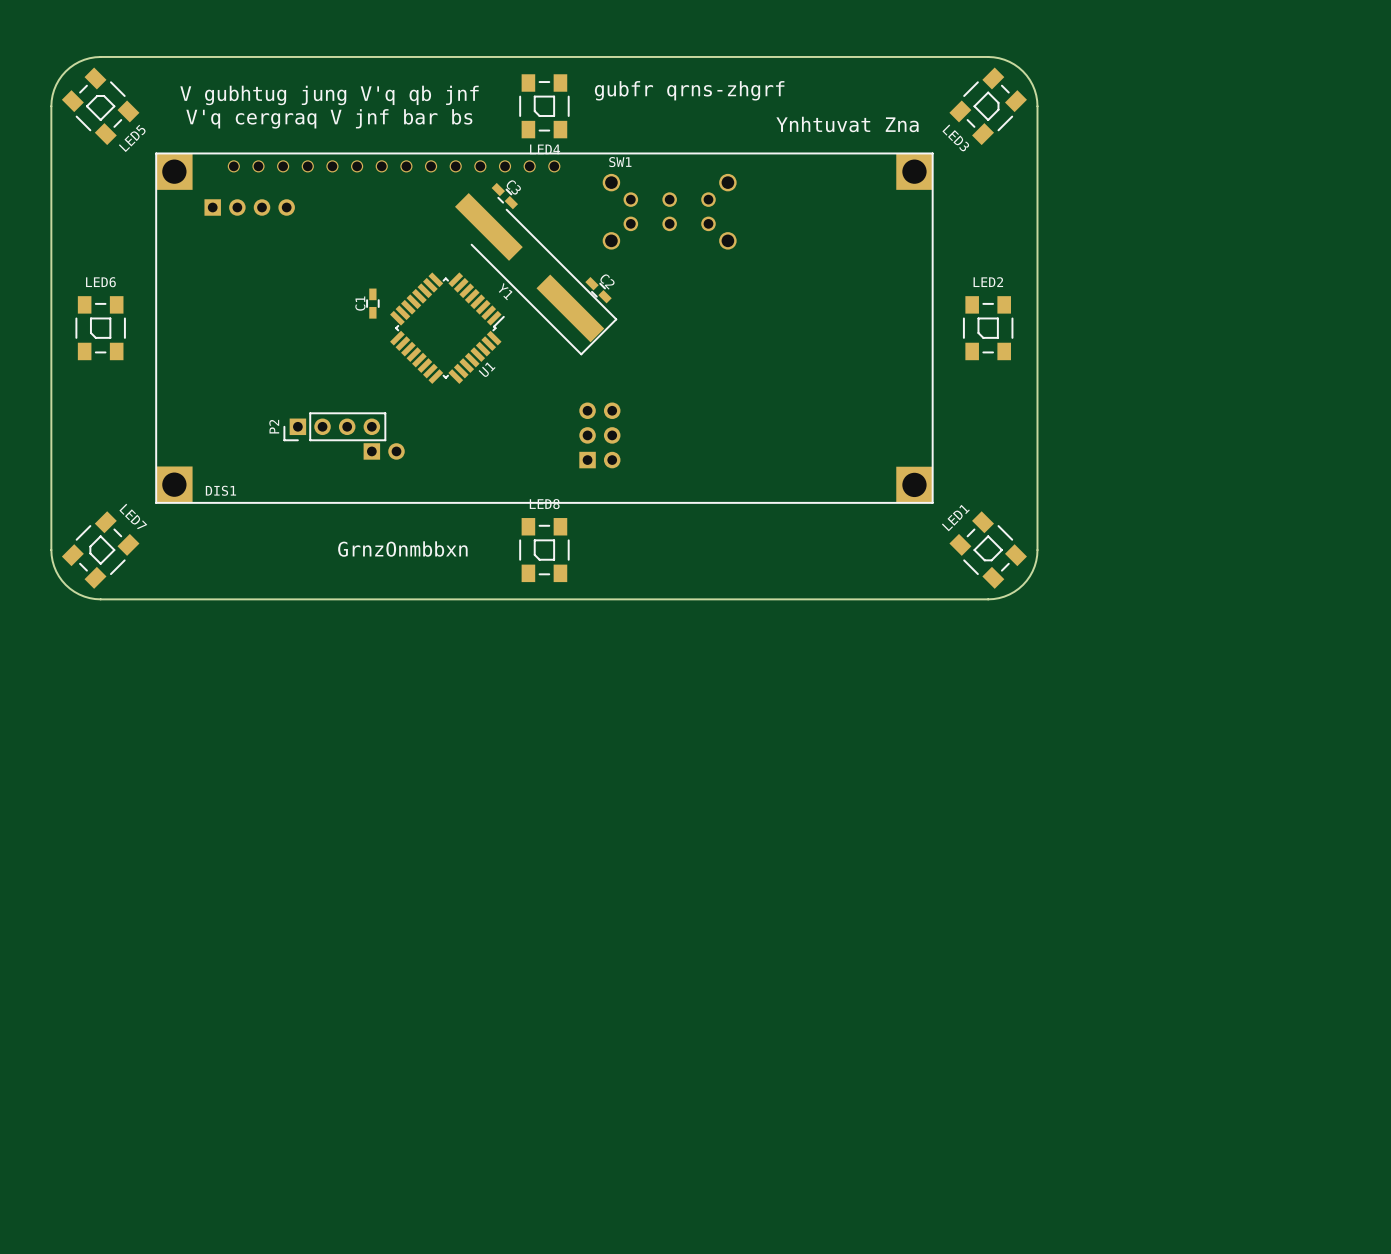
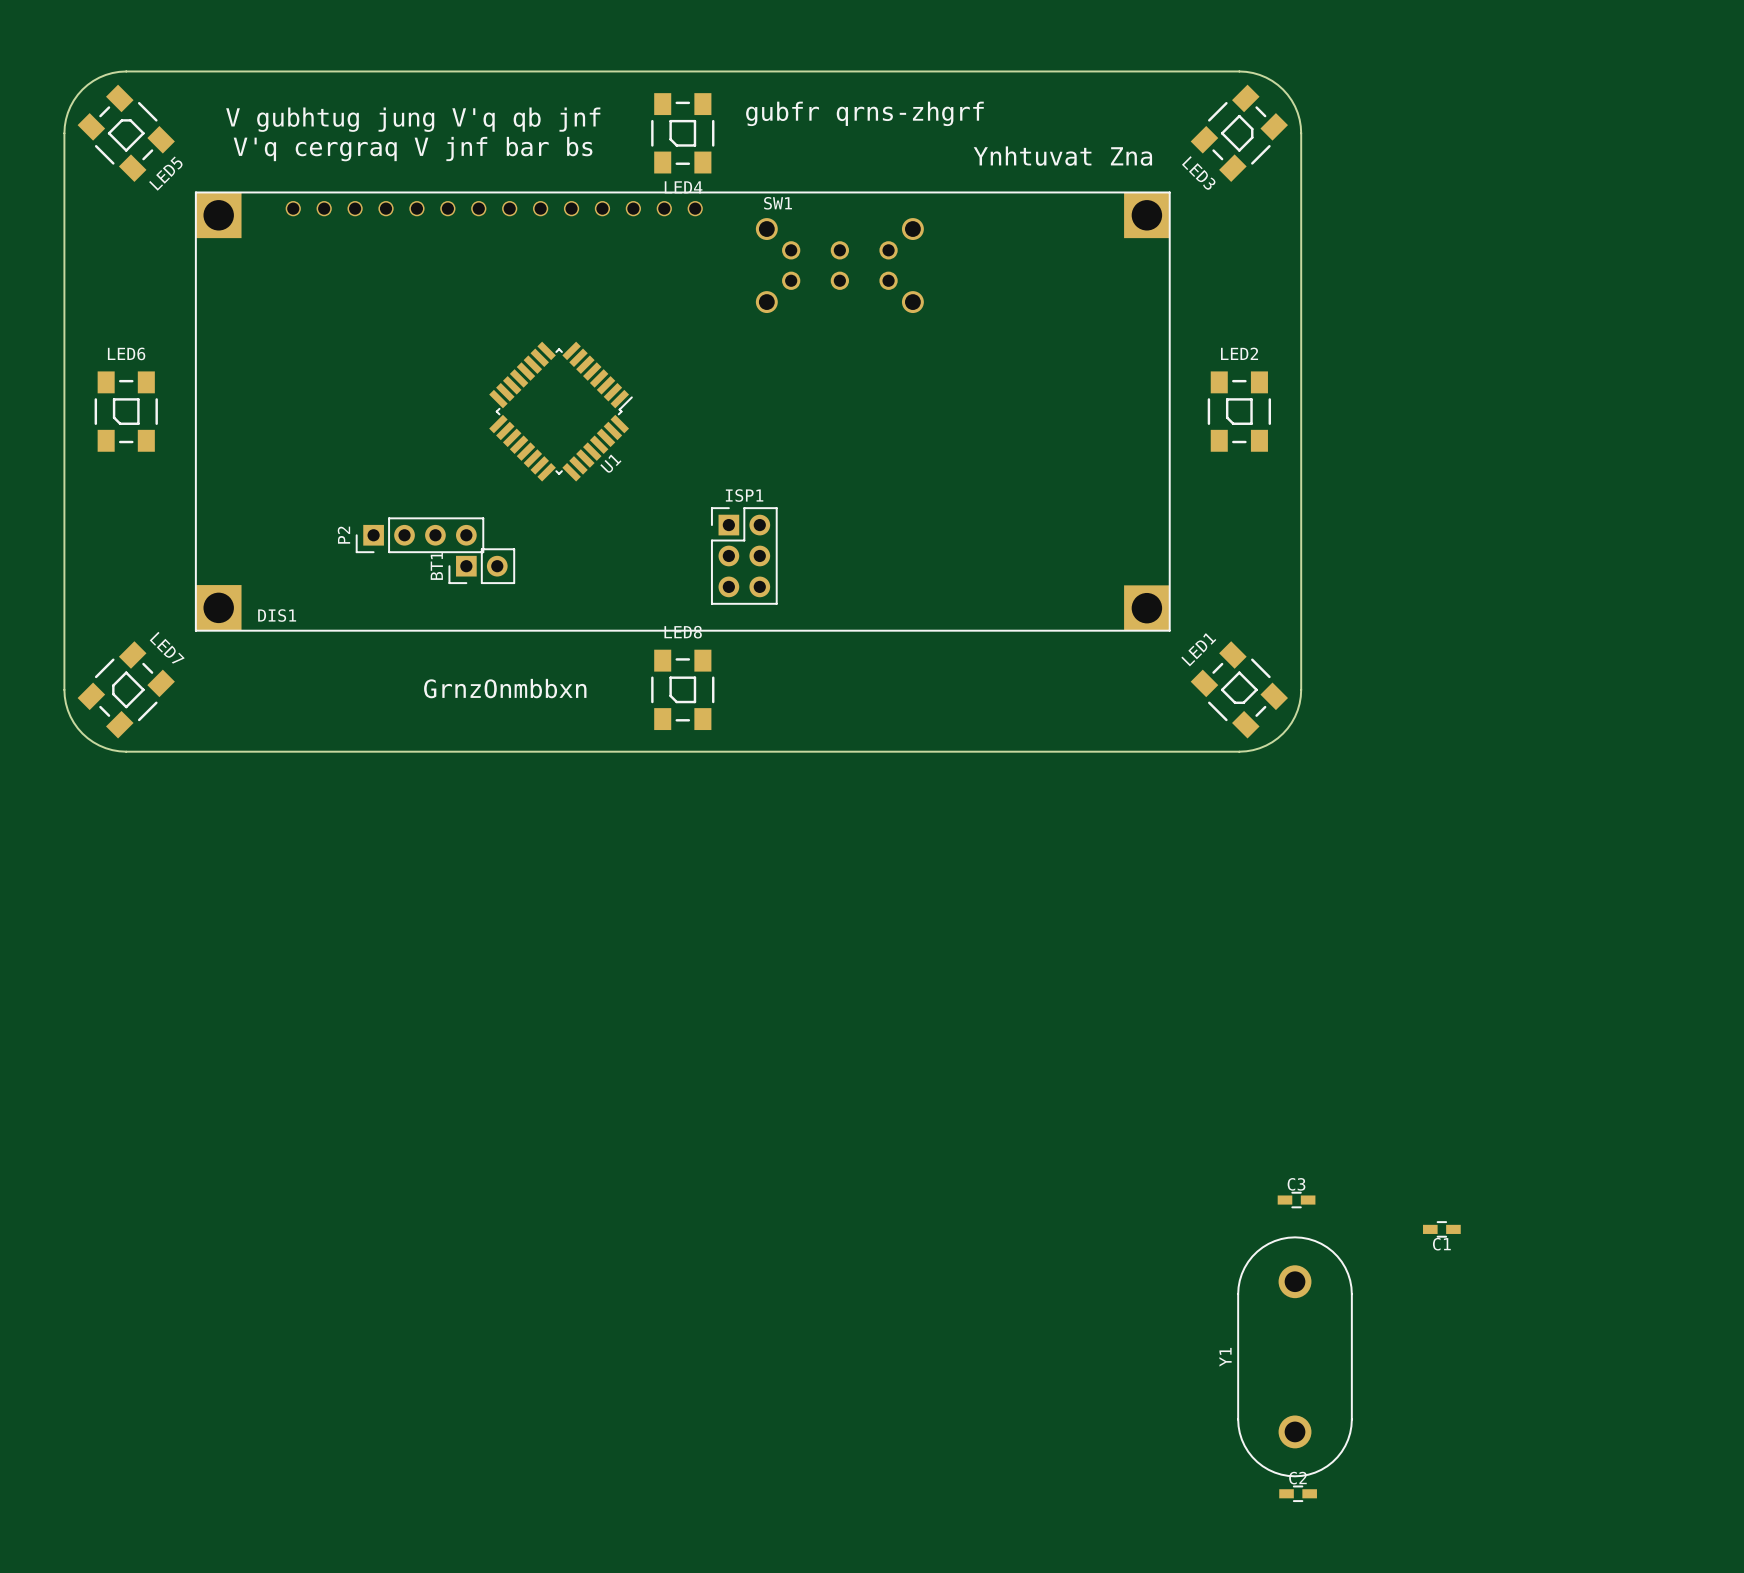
Y1 footprint: [454, 193, 617, 355] -> [1237, 1236, 1353, 1478]
C3 rotation: 0° (504, 196) -> 45° counterclockwise (1296, 1200)
C3 position: (504, 196) -> (1296, 1200)
part: (249, 207) -> none
C2 rotation: 0° (598, 290) -> 45° counterclockwise (1298, 1493)
C2 position: (598, 290) -> (1298, 1493)
Y1 name position: Y1 (505, 291) -> Y1 (1225, 1357)
C1 rotation: 0° (372, 303) -> 90° clockwise (1441, 1229)
C1 position: (372, 303) -> (1441, 1229)
ISP1 side: bottom (599, 435) -> top (744, 555)
BT1 side: bottom (384, 451) -> top (481, 566)

